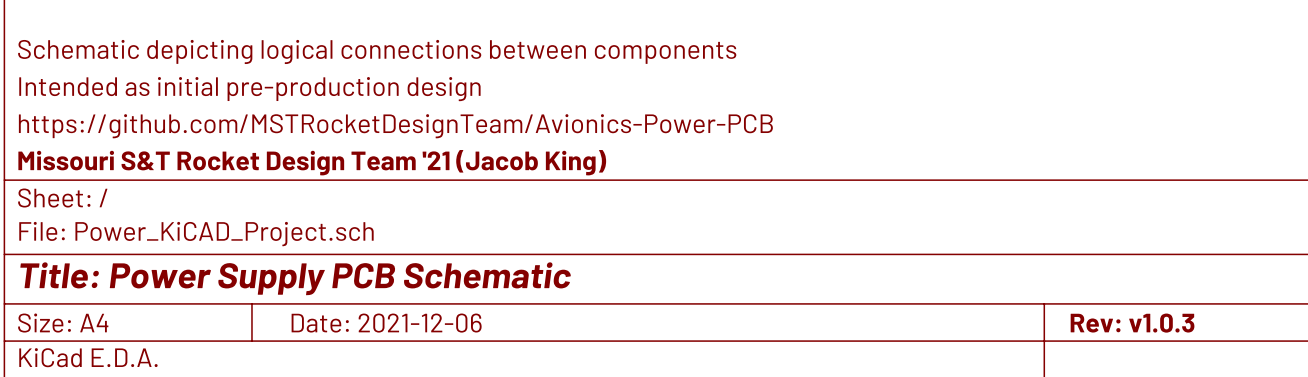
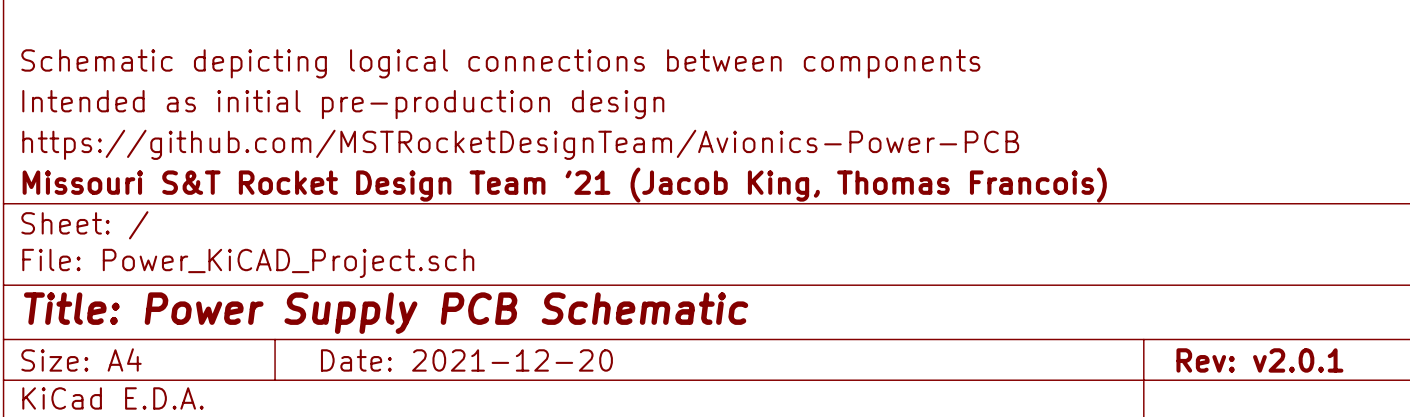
title block: Missouri S&T Rocket Design Team '21 (Jacob King) (312, 162) -> Missouri S&T Rocket Design Team '21 (Jacob King, Thomas Francois) (564, 185)
title block: Date: 2021-12-06 (386, 323) -> Date: 2021-12-20 (466, 360)
title block: Rev: v1.0.3 (1132, 323) -> Rev: v2.0.1 (1259, 360)

